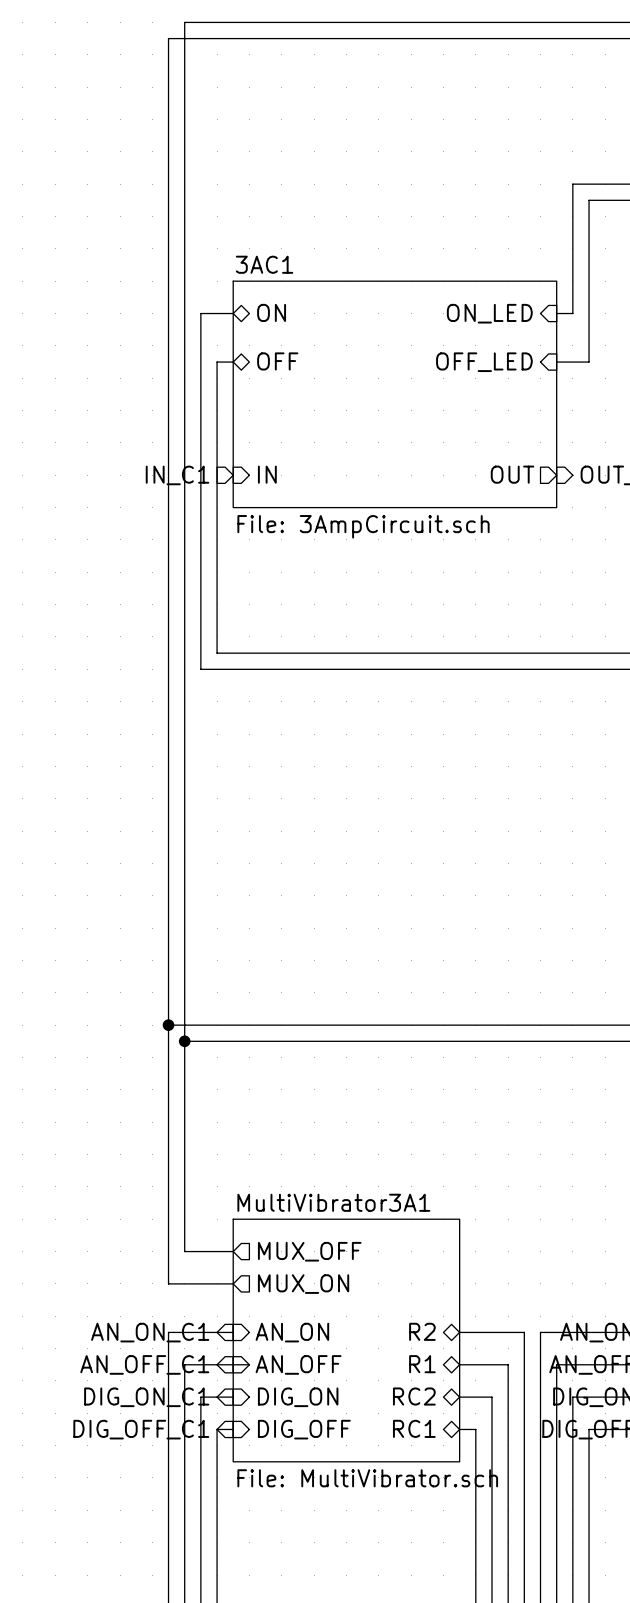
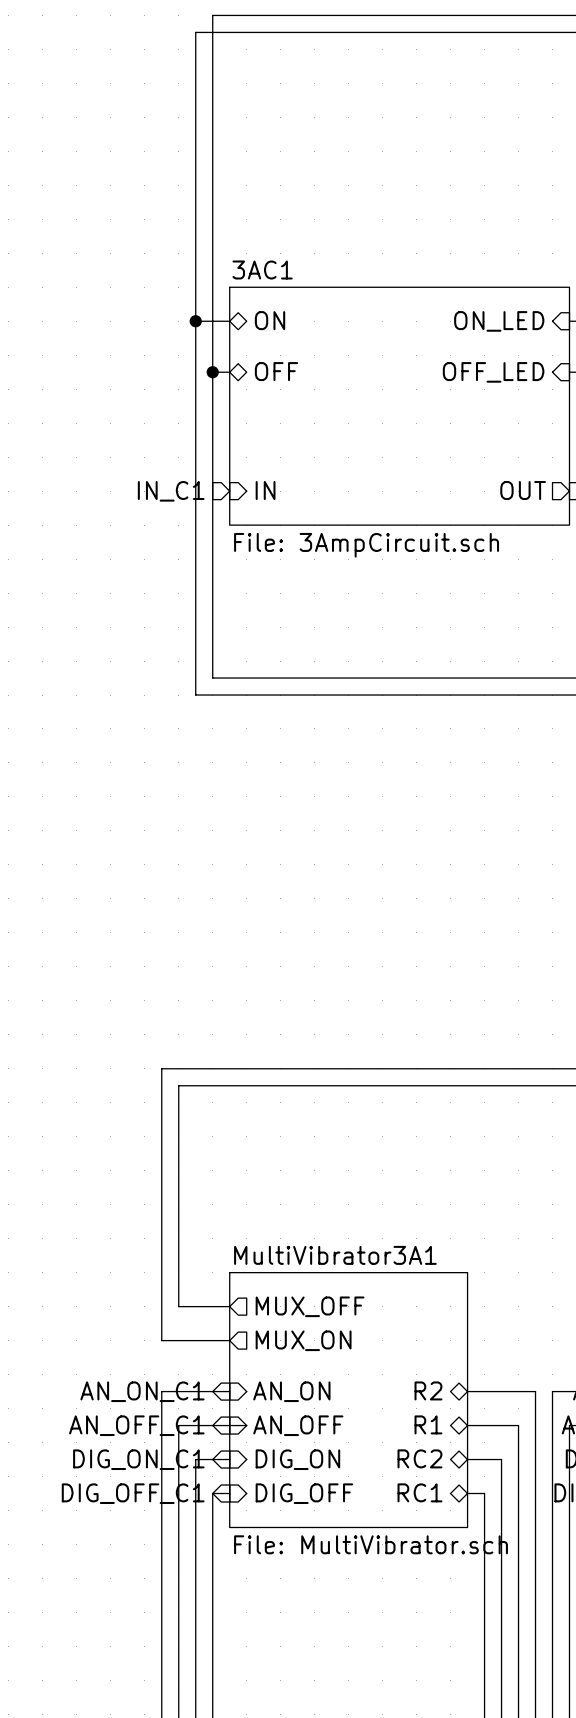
wire: (217, 22) (184, 22) (184, 1041) -> (212, 15) (212, 372)
wire: (200, 38) (168, 38) (168, 1025) -> (195, 32) (195, 321)
junction: none -> (195, 321)
junction: none -> (212, 372)
junction: (168, 1025) -> none
junction: (184, 1041) -> none

